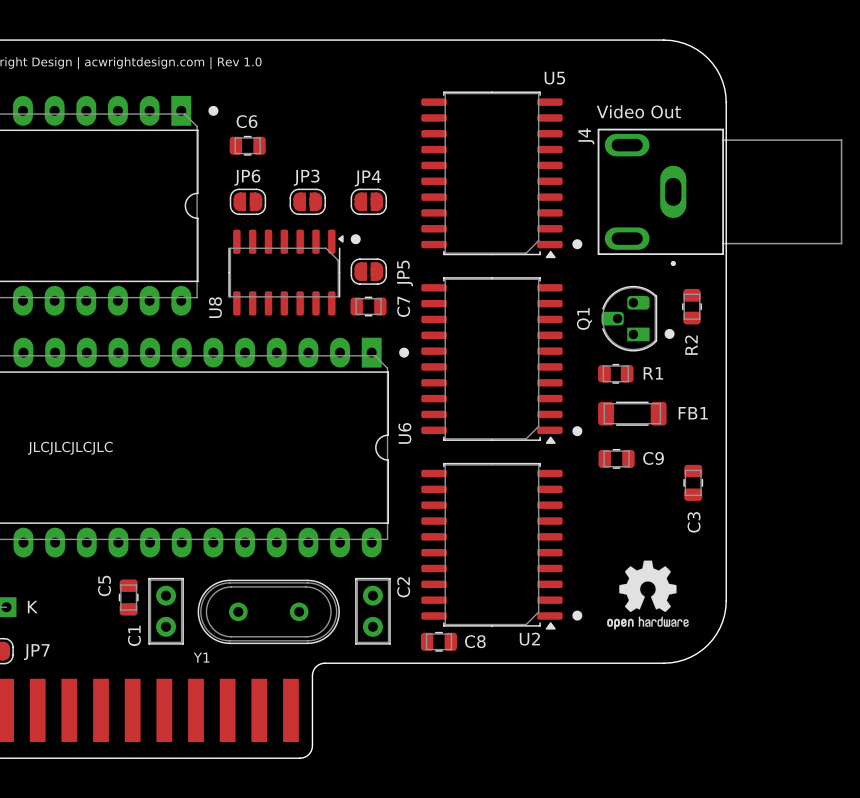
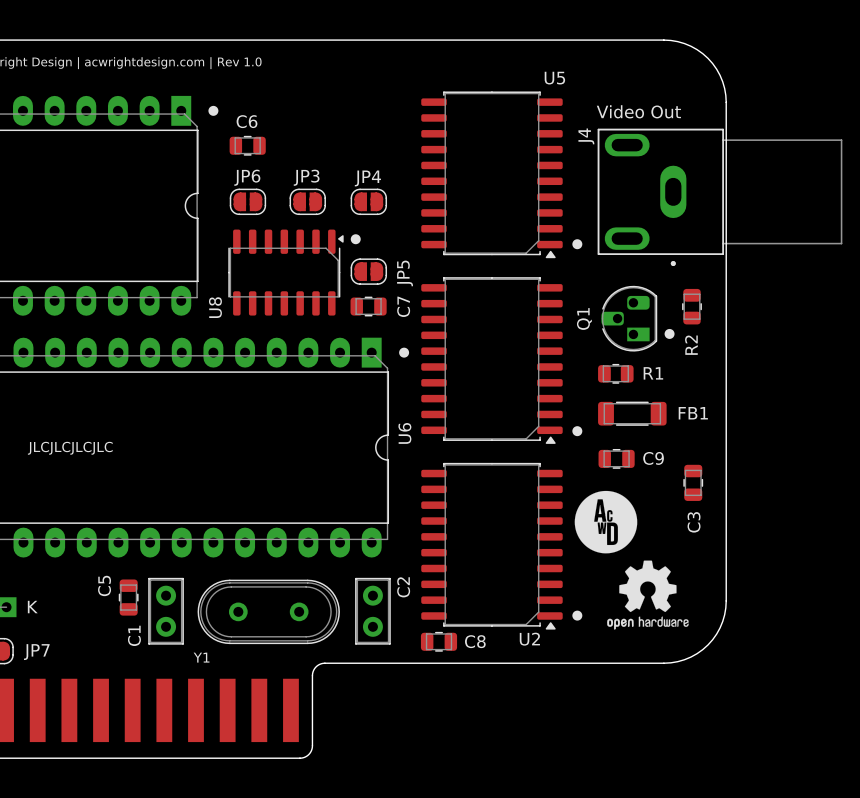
drawing: none -> [574, 490, 638, 554]

